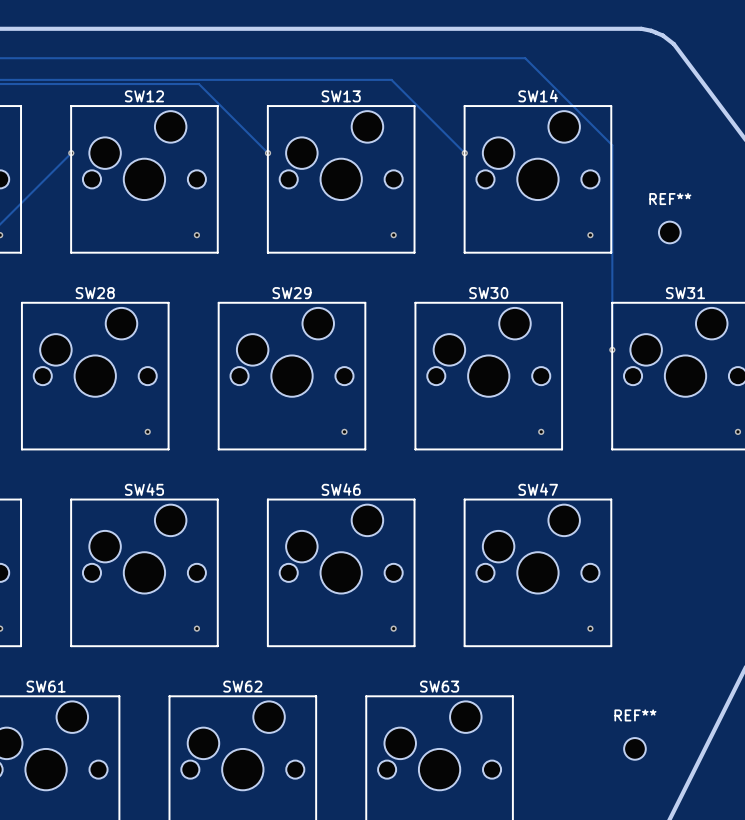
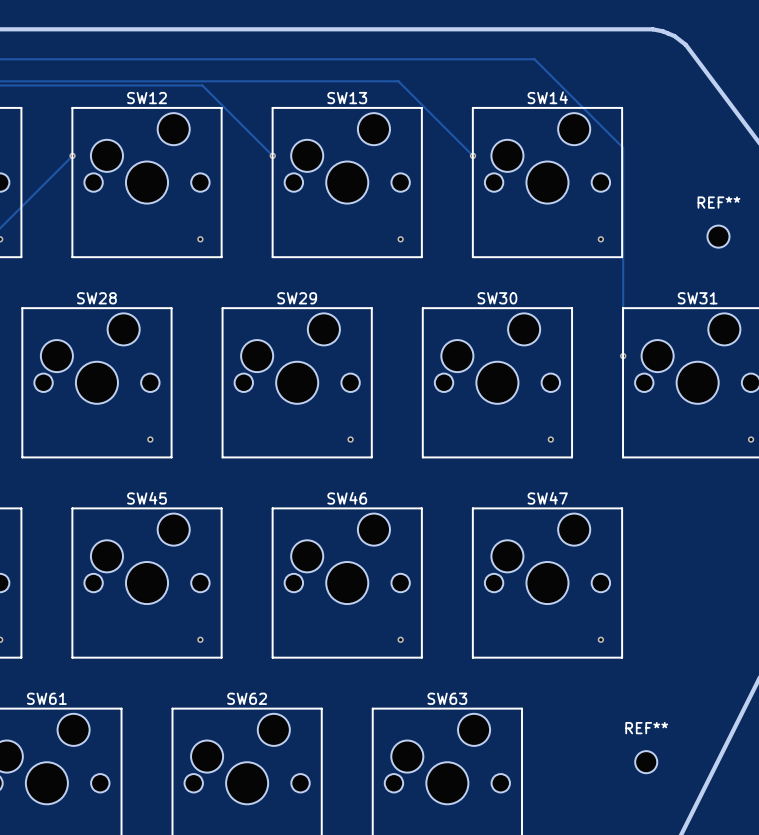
REF** position: (669, 232) -> (718, 236)

